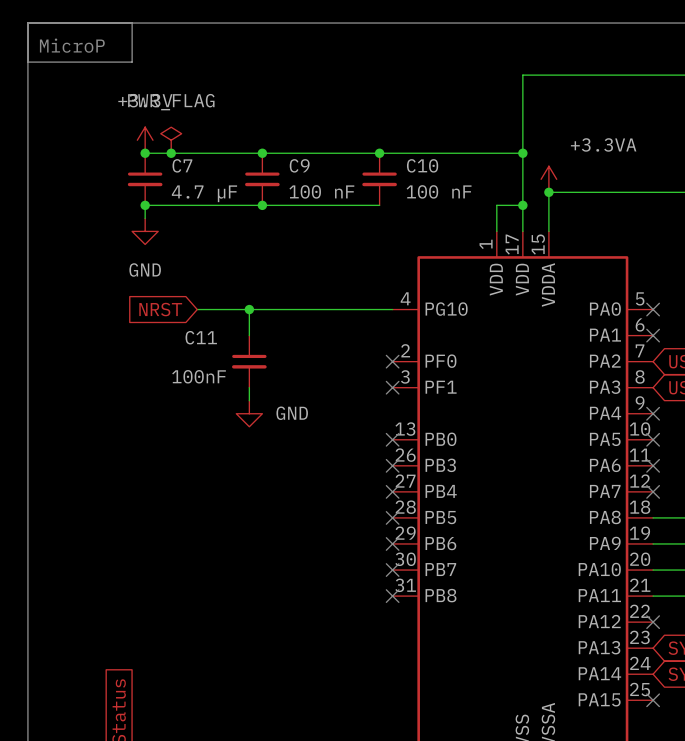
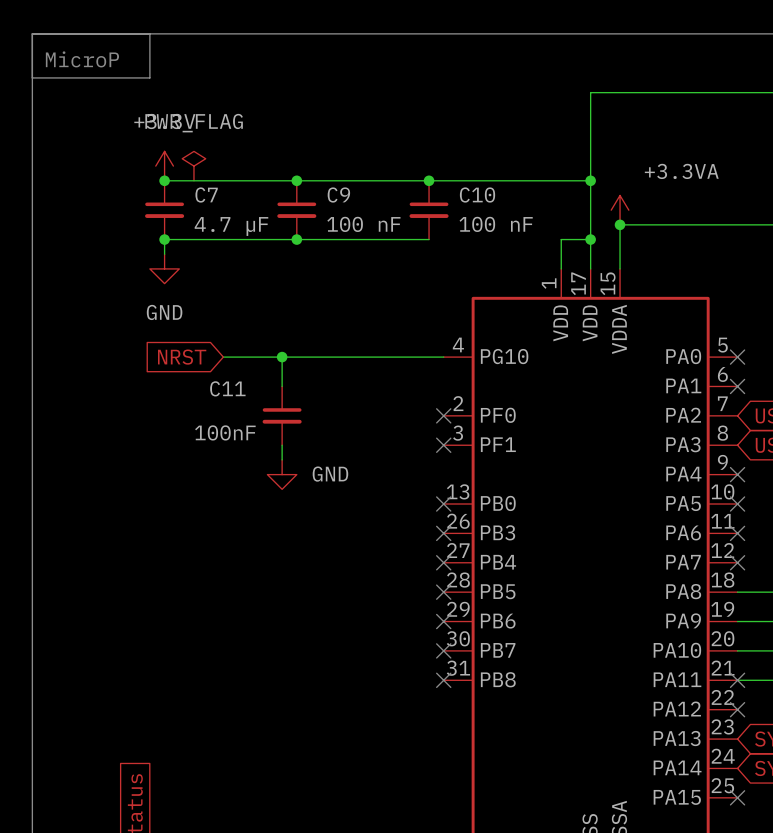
junction: (171, 153) -> none
no-connect mark: none -> (737, 680)

